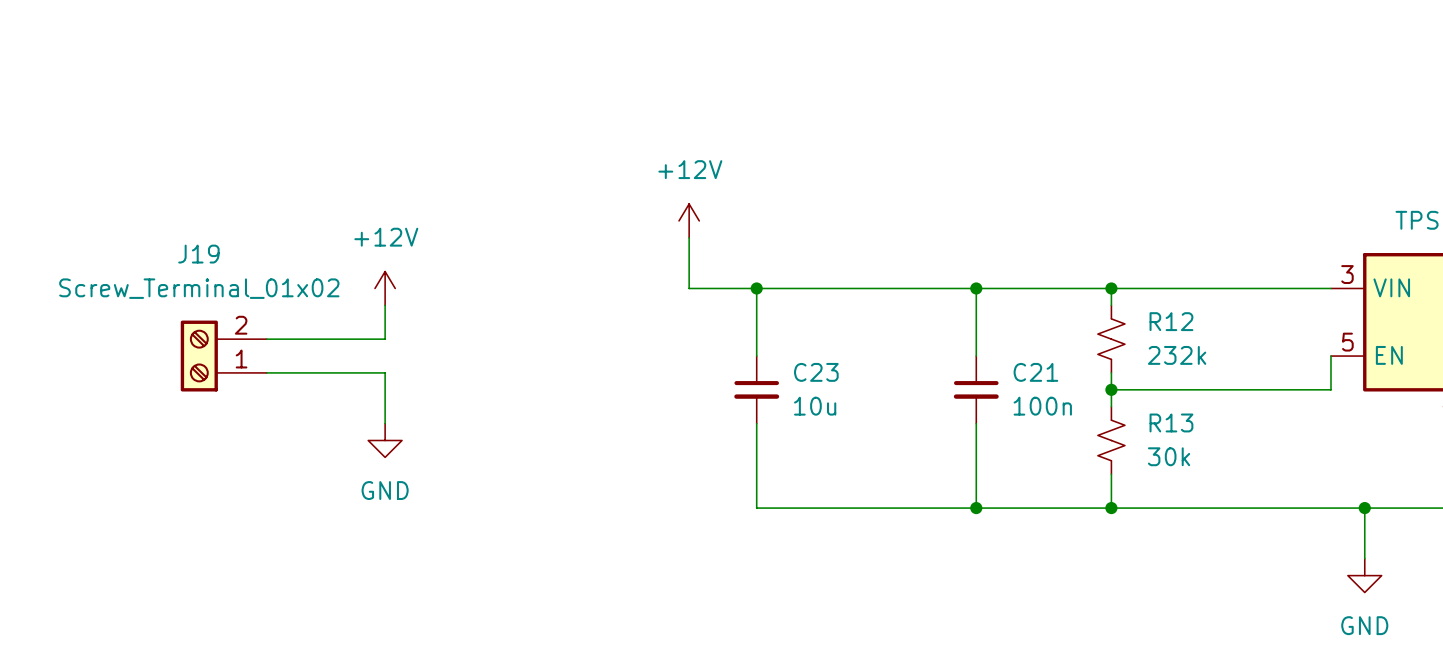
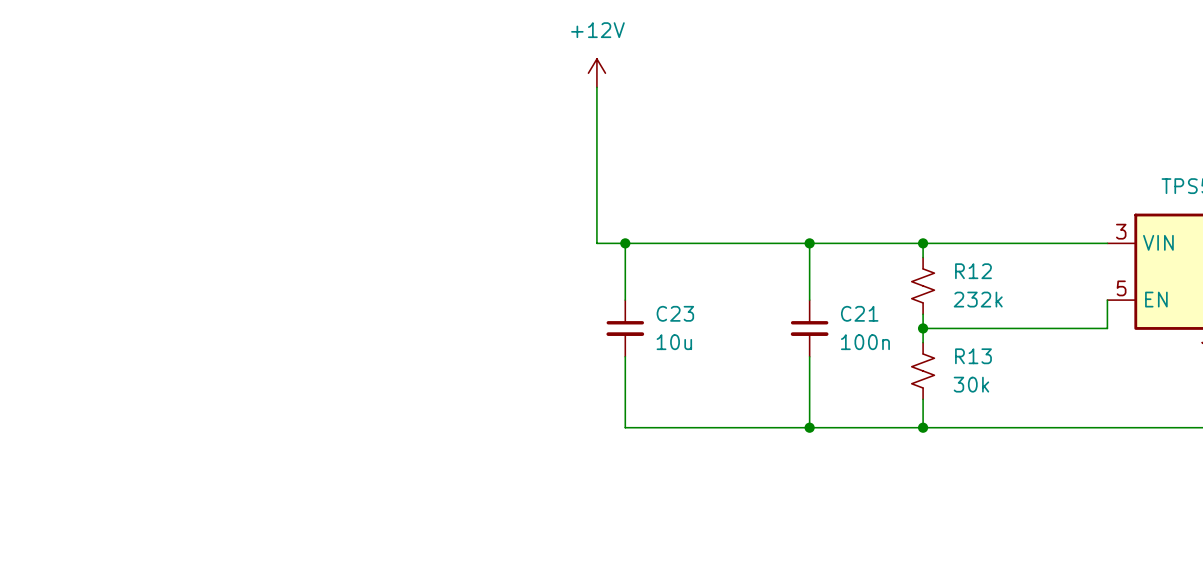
power symbol position: +12V (689, 220) -> +12V (596, 73)
wire: (689, 237) (689, 288) (722, 288) -> (596, 87) (596, 243)
power symbol: +12V (385, 288) -> none
wire: (385, 305) (385, 339) (266, 339) -> none
J19: Screw_Terminal_01x02 (223, 356) -> none
wire: (266, 372) (385, 372) (385, 423) -> none
power symbol: GND (385, 440) -> none
wire: (1364, 508) (1364, 558) -> none
junction: (1364, 508) -> none
power symbol: GND (1364, 575) -> none

